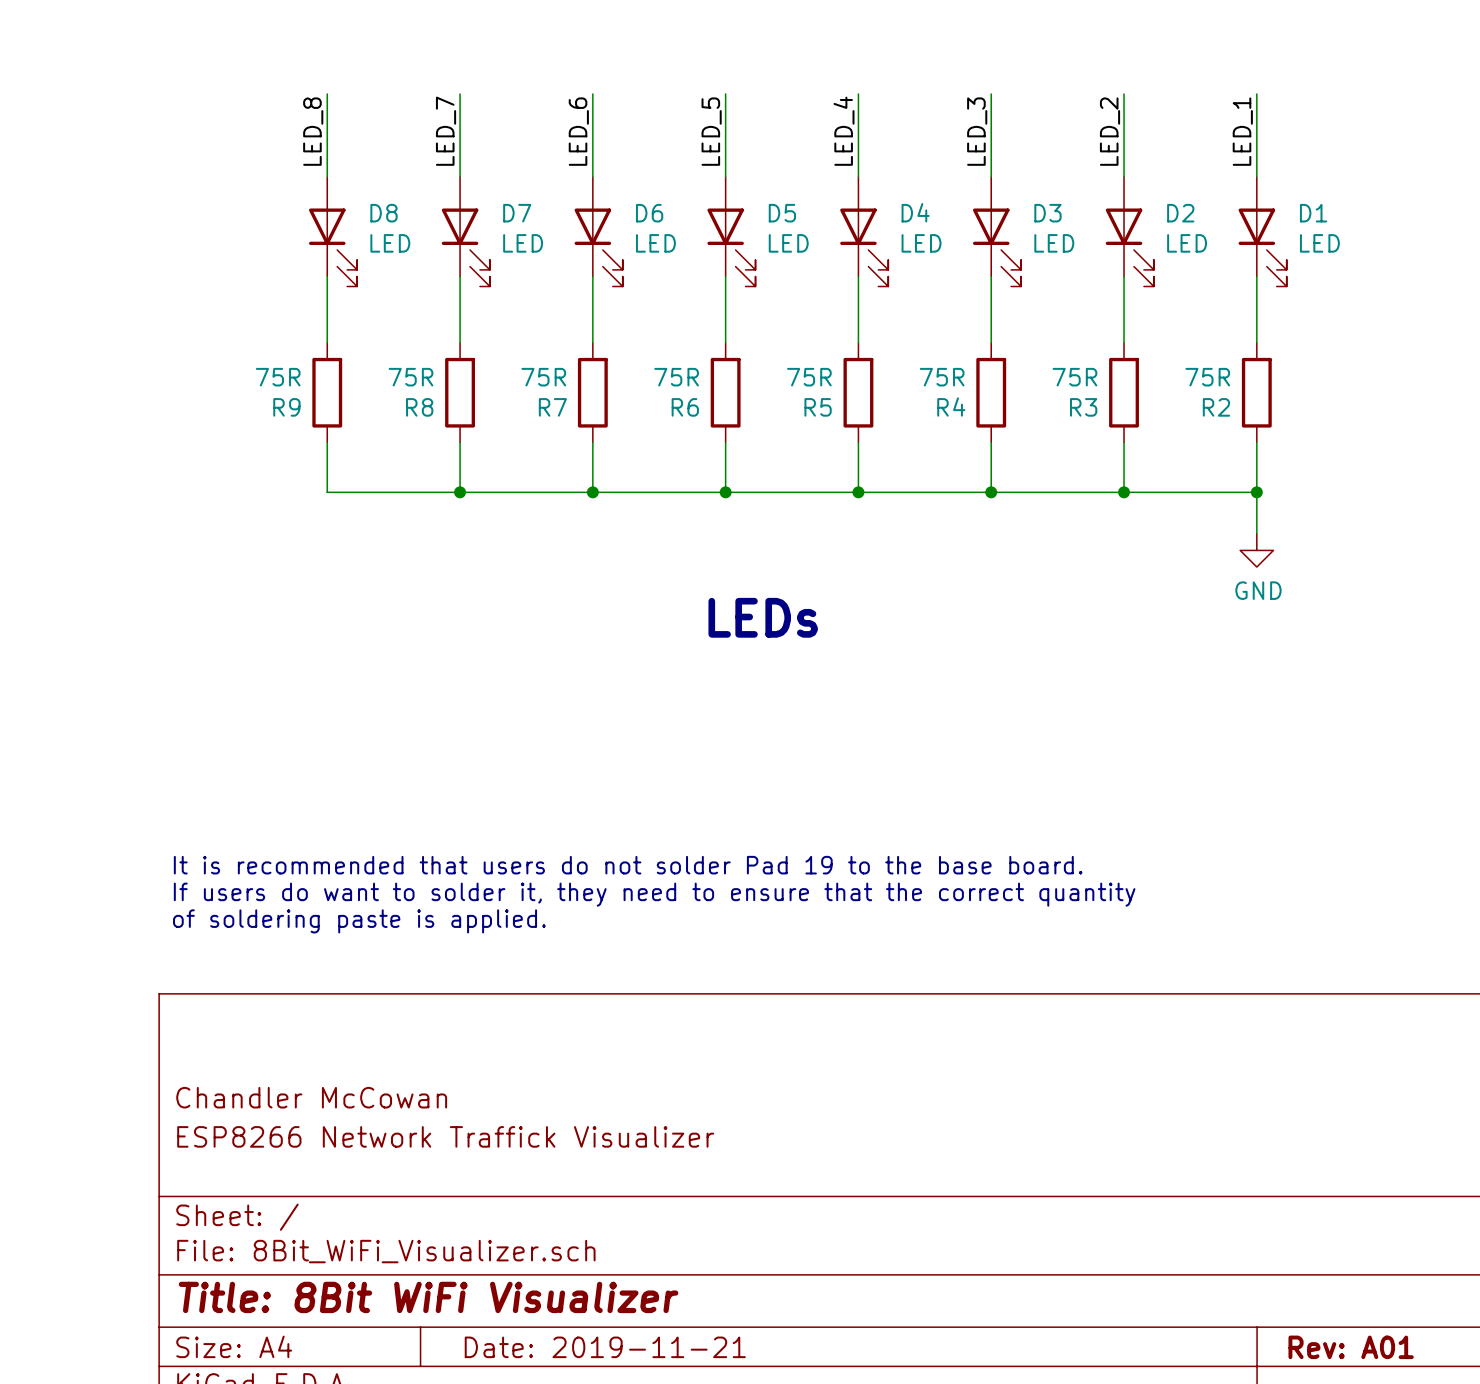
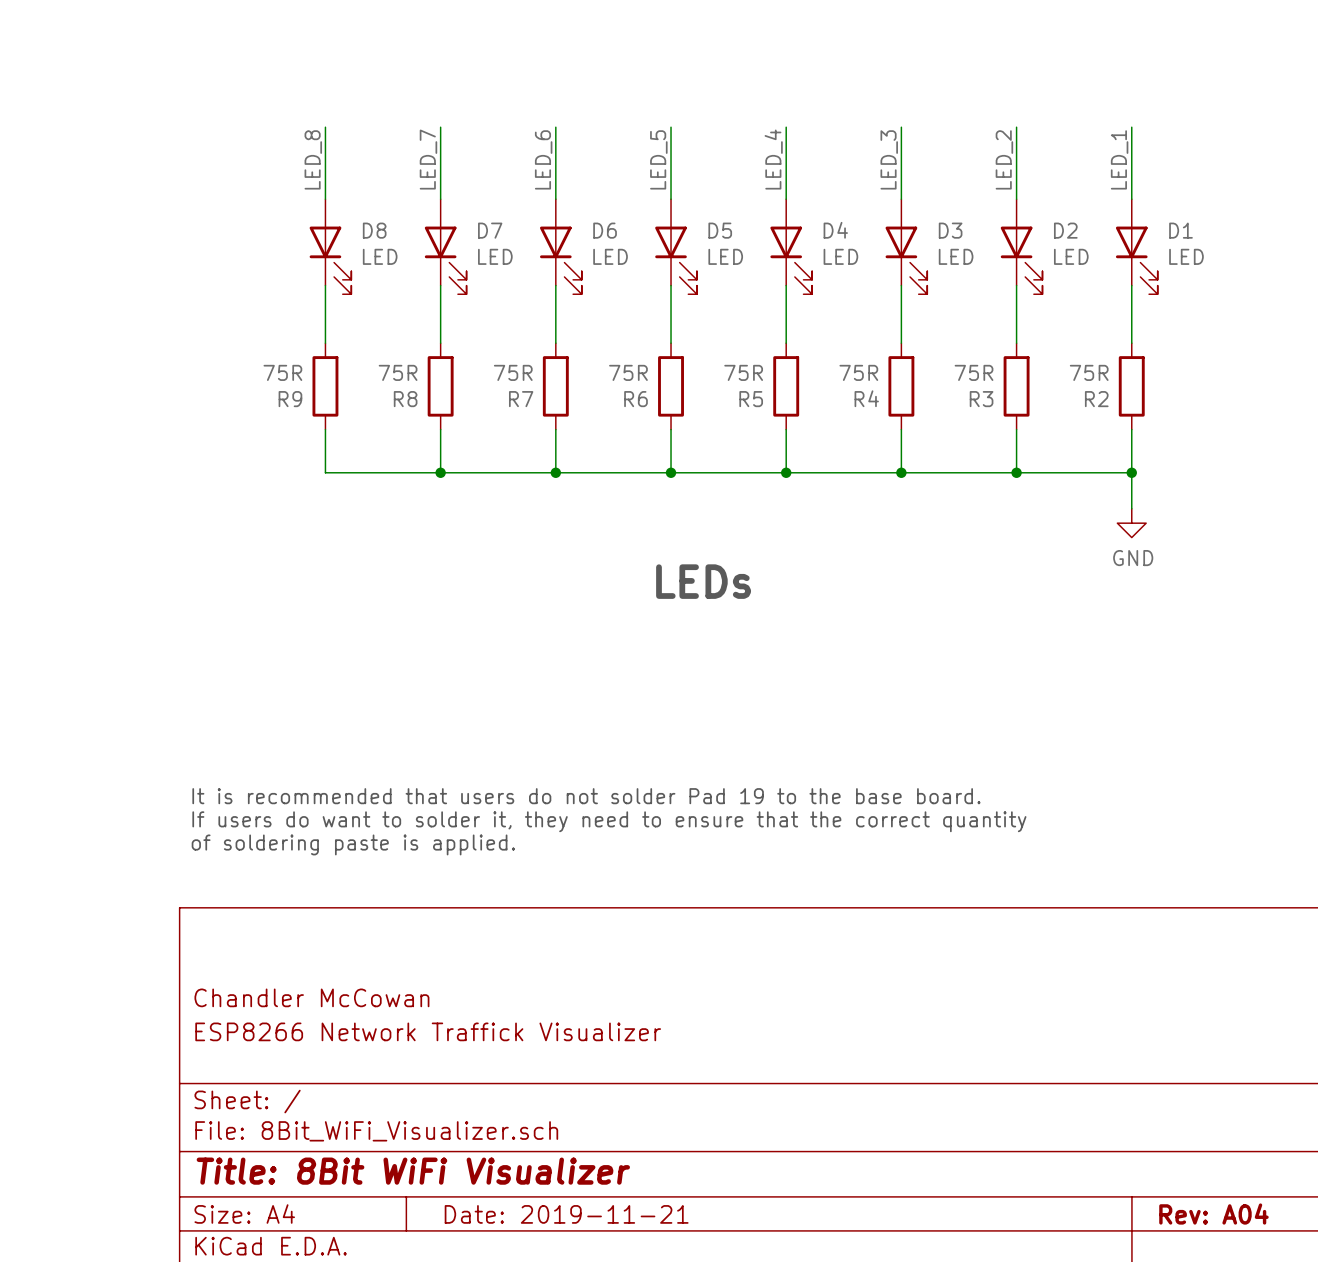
title block: Rev: A01 (1351, 1347) -> Rev: A04 (1213, 1214)

